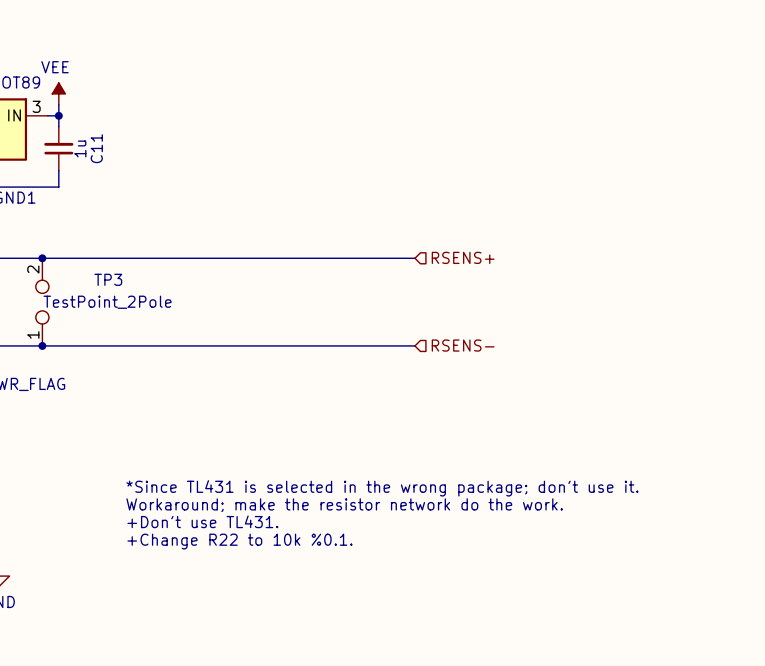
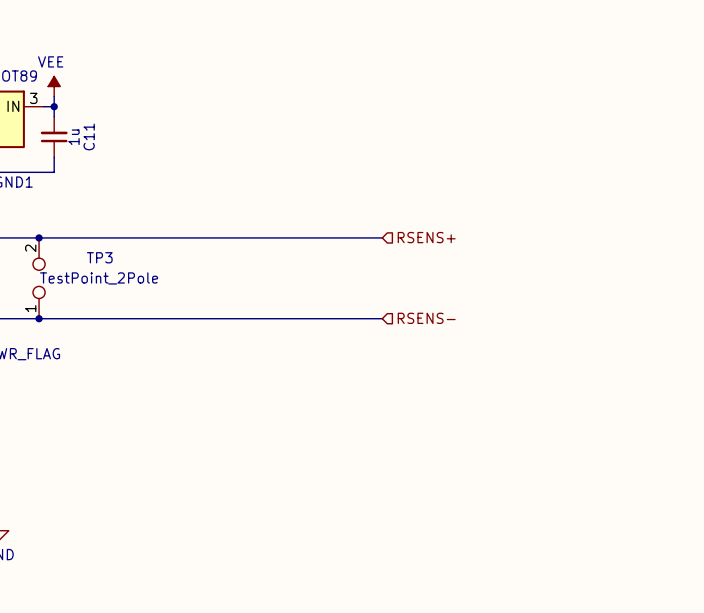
text: *Since TL431 is selected in the wrong package; don't use it. (382, 488) -> none
text: Workaround; make the resistor network do the work. (344, 505) -> none
text: +Don't use TL431. (202, 521) -> none
text: +Change R22 to 10k %0.1. (239, 541) -> none

